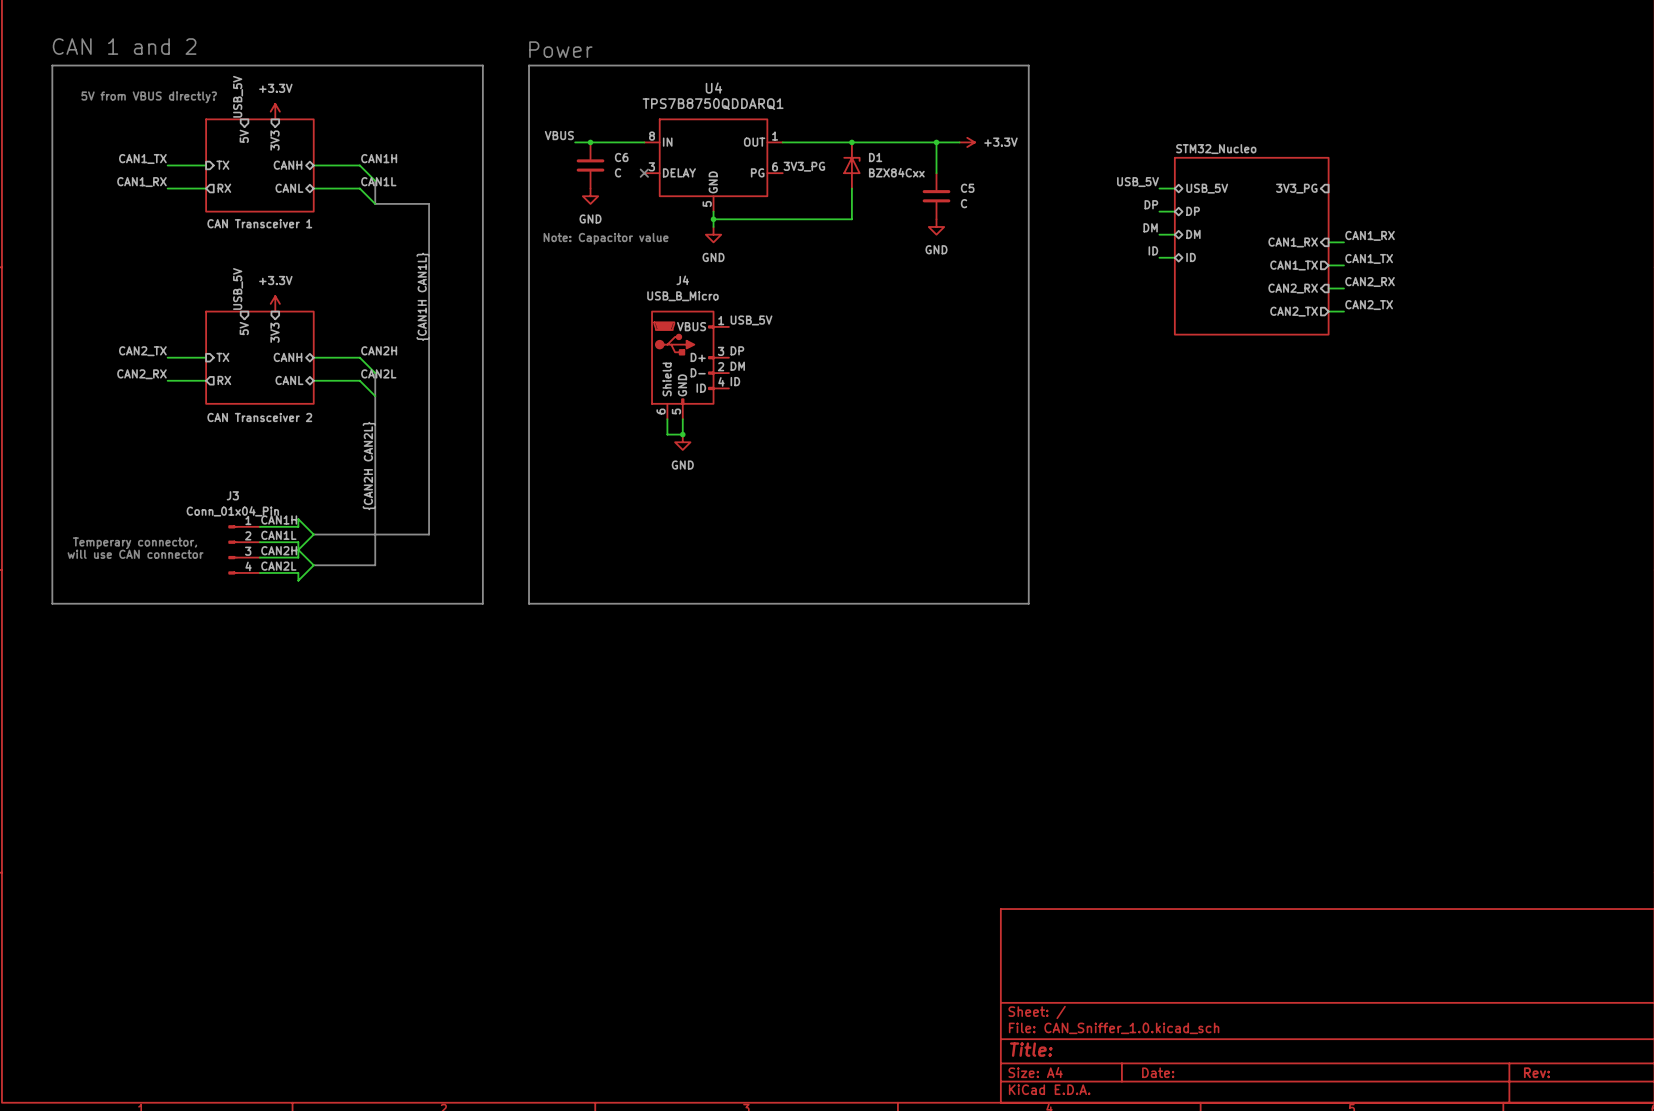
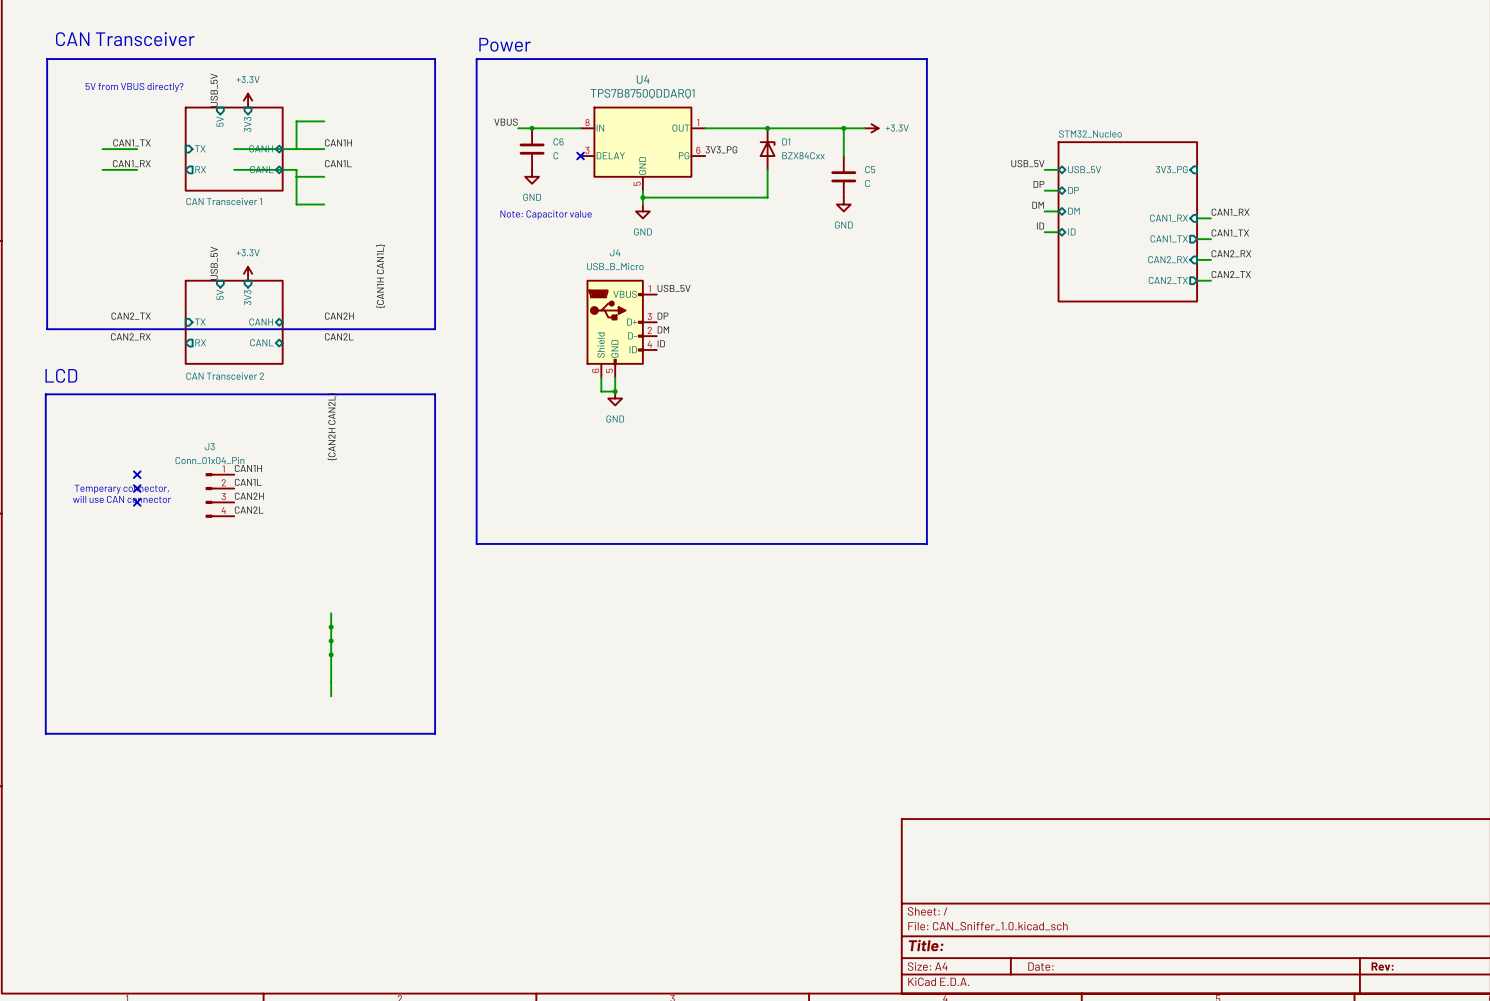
text: none -> CAN Transceiver (125, 39)
text: CAN 1 and 2 (124, 46) -> none
wire: none -> (324, 121) (296, 121) (296, 149)
wire: (167, 165) (206, 165) -> (102, 149) (137, 149)
wire: none -> (234, 149) (282, 149)
wire: (359, 165) (375, 180) -> none
bus: (375, 180) (375, 203) (429, 203) (429, 534) (313, 534) -> none
wire: (167, 188) (206, 188) -> (102, 169) (137, 169)
wire: none -> (234, 169) (282, 169)
wire: (329, 188) (359, 188) (375, 203) -> (296, 169) (296, 204) (324, 204)
wire: none -> (296, 176) (324, 176)
wire: (167, 357) (206, 357) -> none
wire: (313, 357) (359, 357) (375, 373) -> none
line: (52, 365) (52, 603) (482, 603) -> (47, 329) (435, 329)
line: (482, 365) (482, 437) -> (435, 543) (435, 733) (45, 733) (45, 394) (435, 394)
bus: (375, 373) (375, 565) (313, 565) -> none
wire: (167, 380) (206, 380) -> none
wire: (313, 380) (359, 380) (375, 396) -> none
text: none -> LCD (61, 375)
no-connect mark: none -> (137, 474)
wire: (259, 526) (298, 526) (298, 519) (313, 534) (298, 549) (313, 565) (298, 580) (298, 572) (259, 572) -> none
no-connect mark: none -> (137, 488)
wire: (259, 542) (298, 542) (298, 557) (259, 557) -> none
no-connect mark: none -> (137, 502)
wire: none -> (331, 613) (331, 696)
junction: none -> (331, 627)
junction: none -> (331, 640)
junction: none -> (331, 654)

